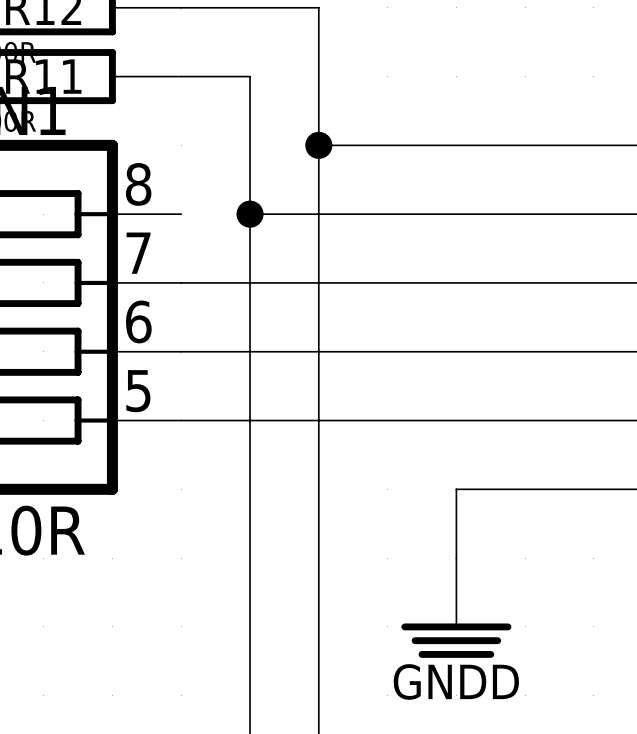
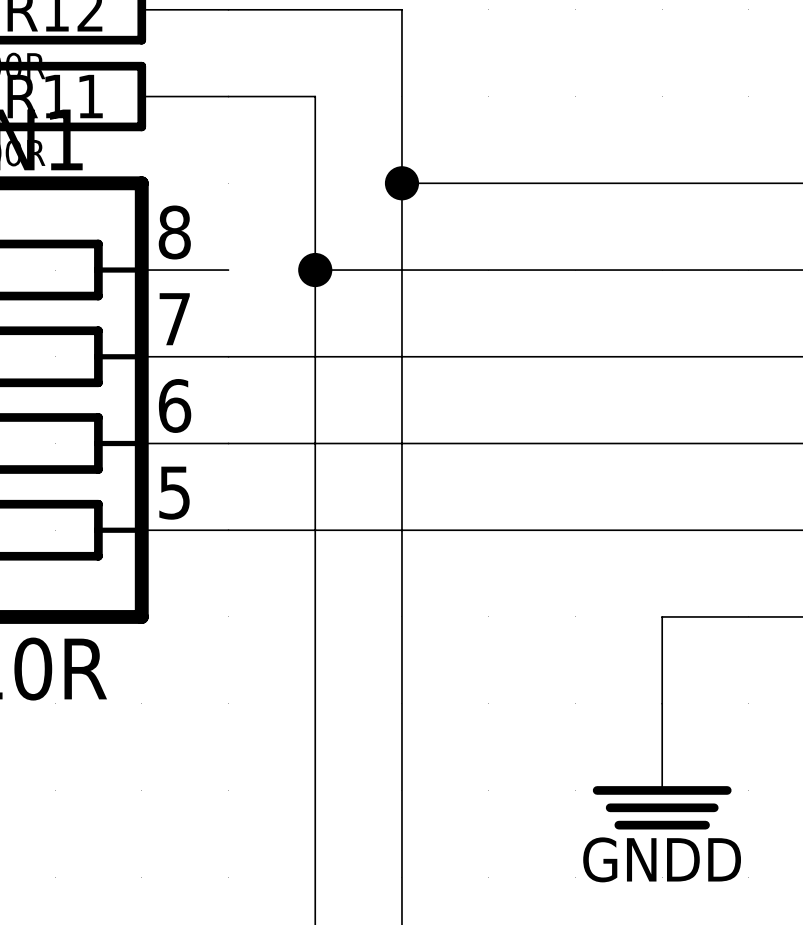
wire: (525, 489) (456, 489) (456, 558) -> (662, 616) (662, 703)
power symbol position: GNDD (456, 607) -> GNDD (662, 766)

